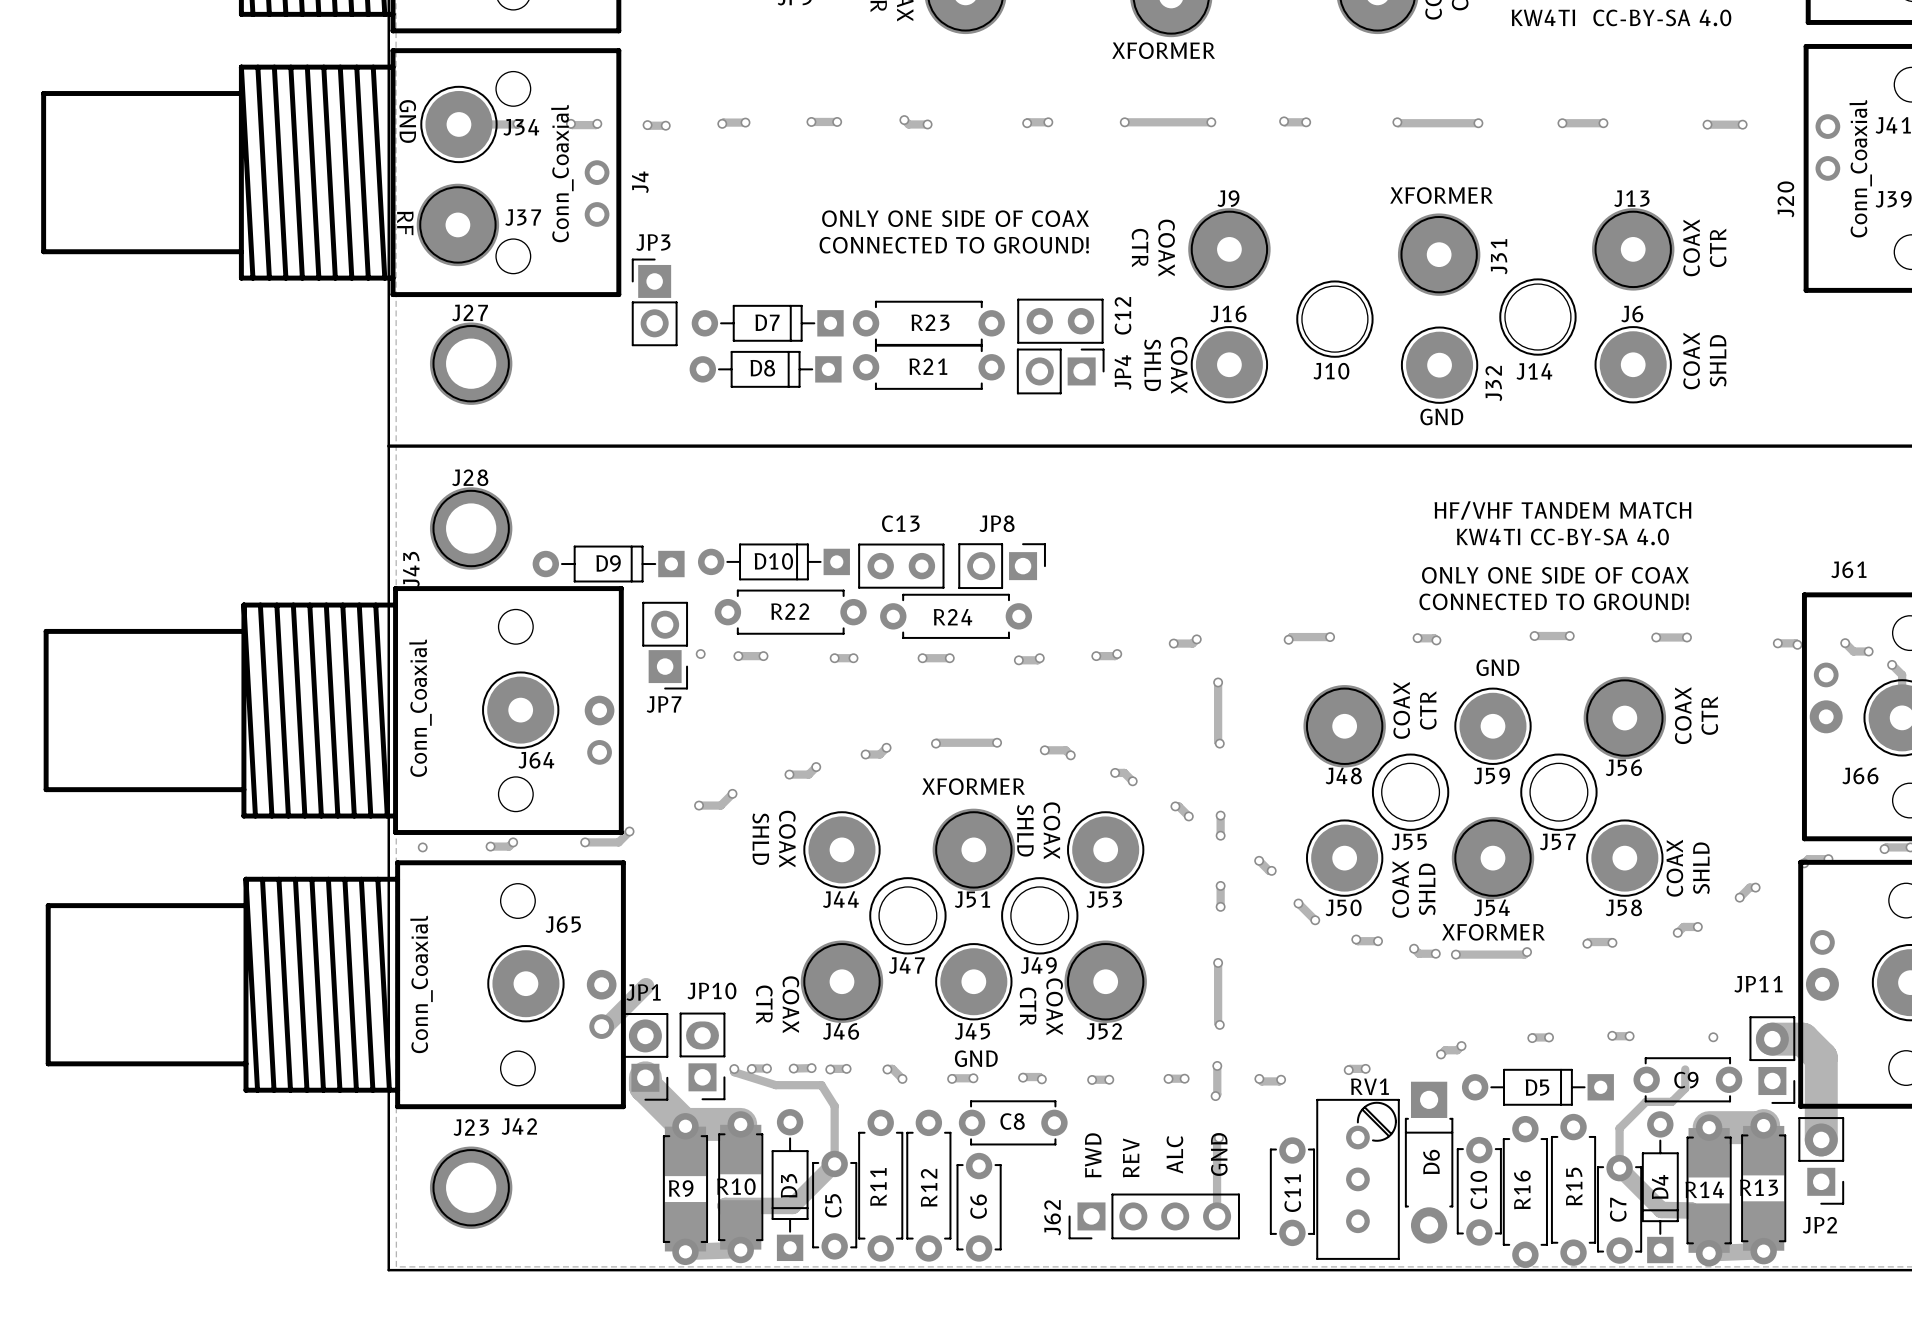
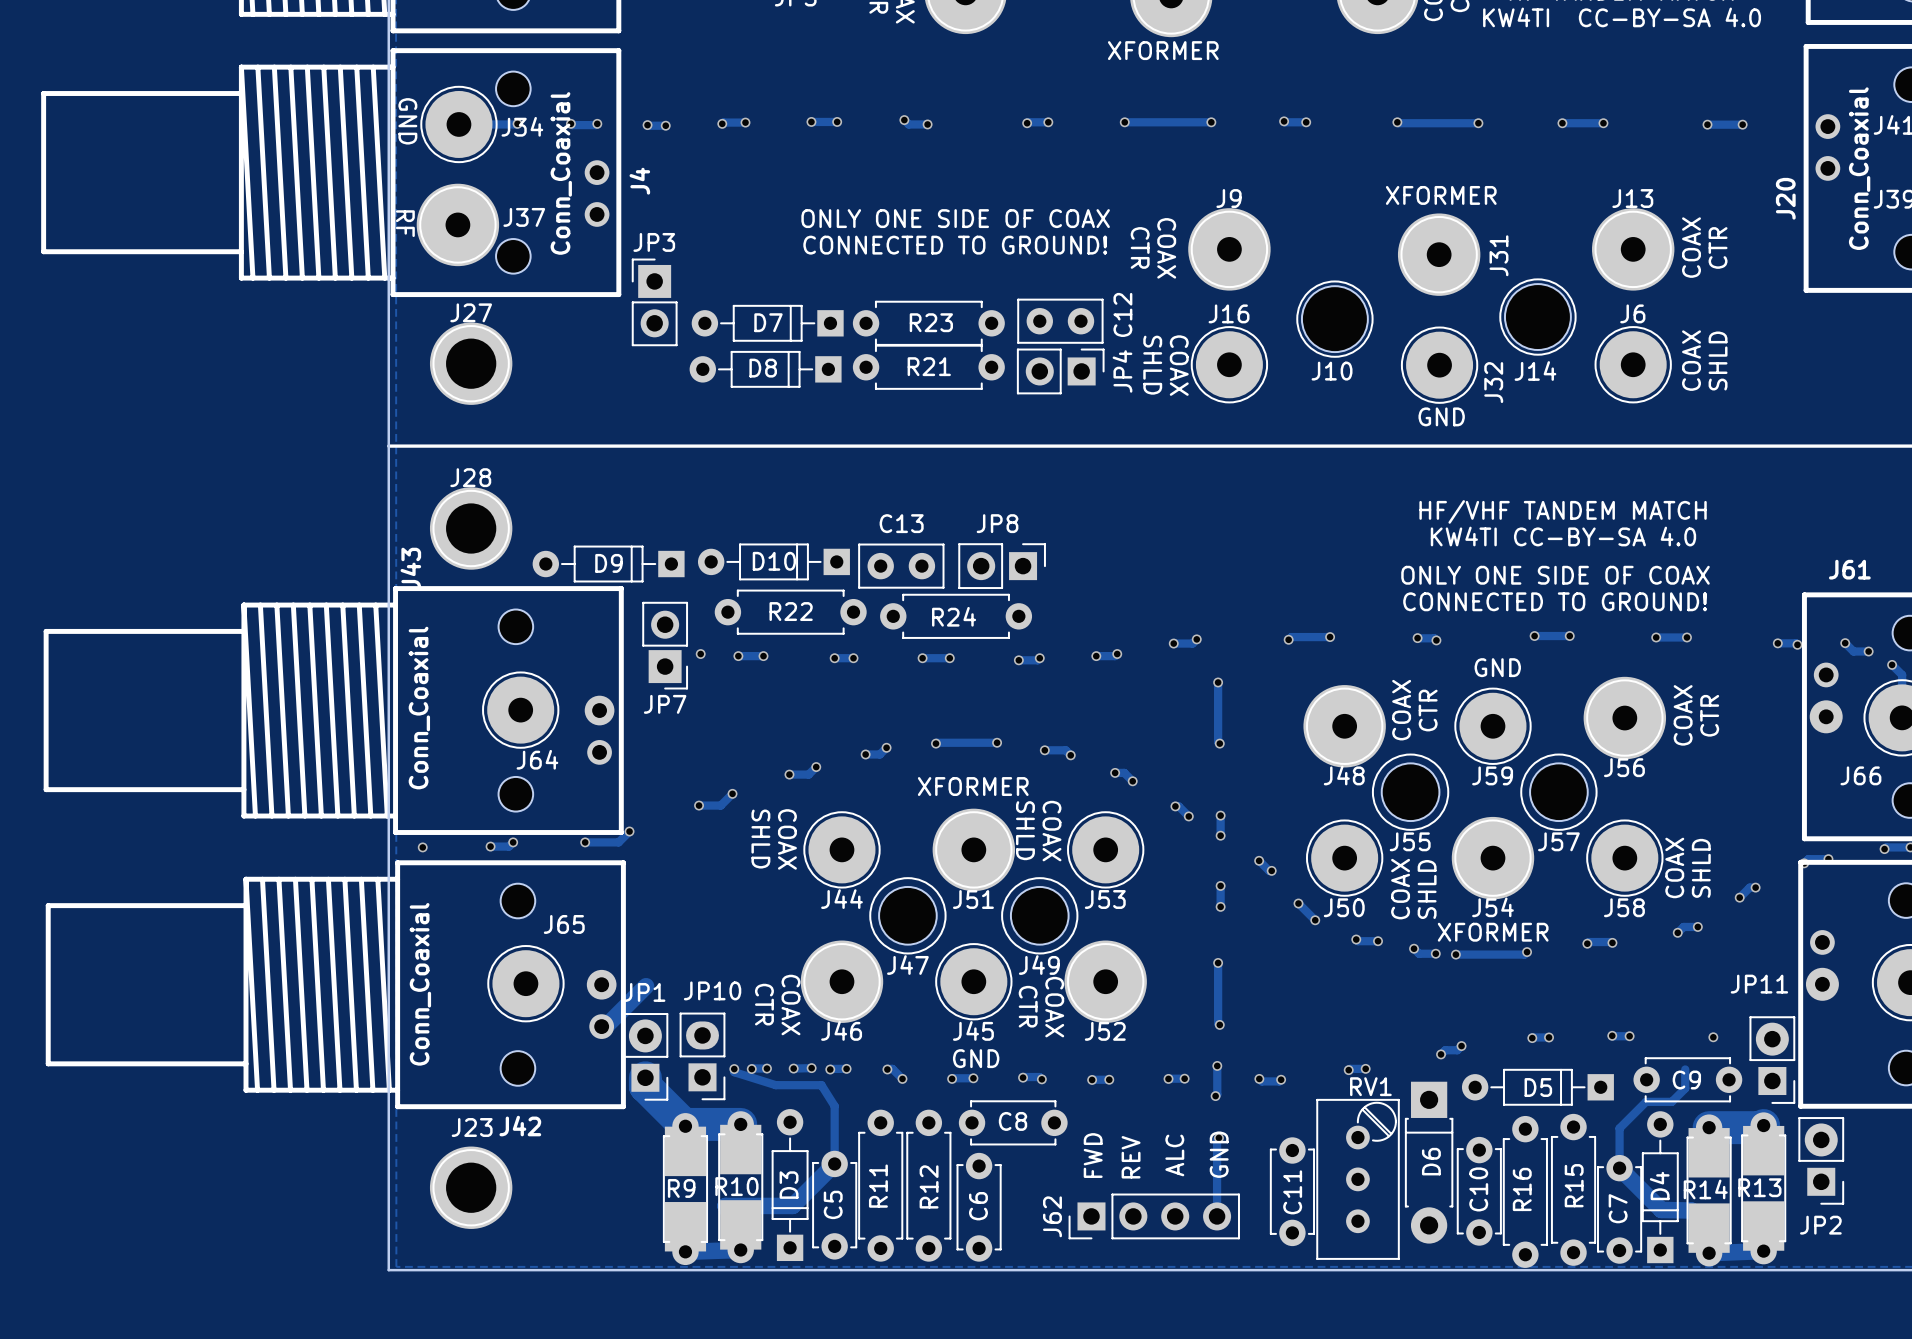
track: (1772, 1039) (1802, 1039) (1821, 1057) (1821, 1139) -> none

